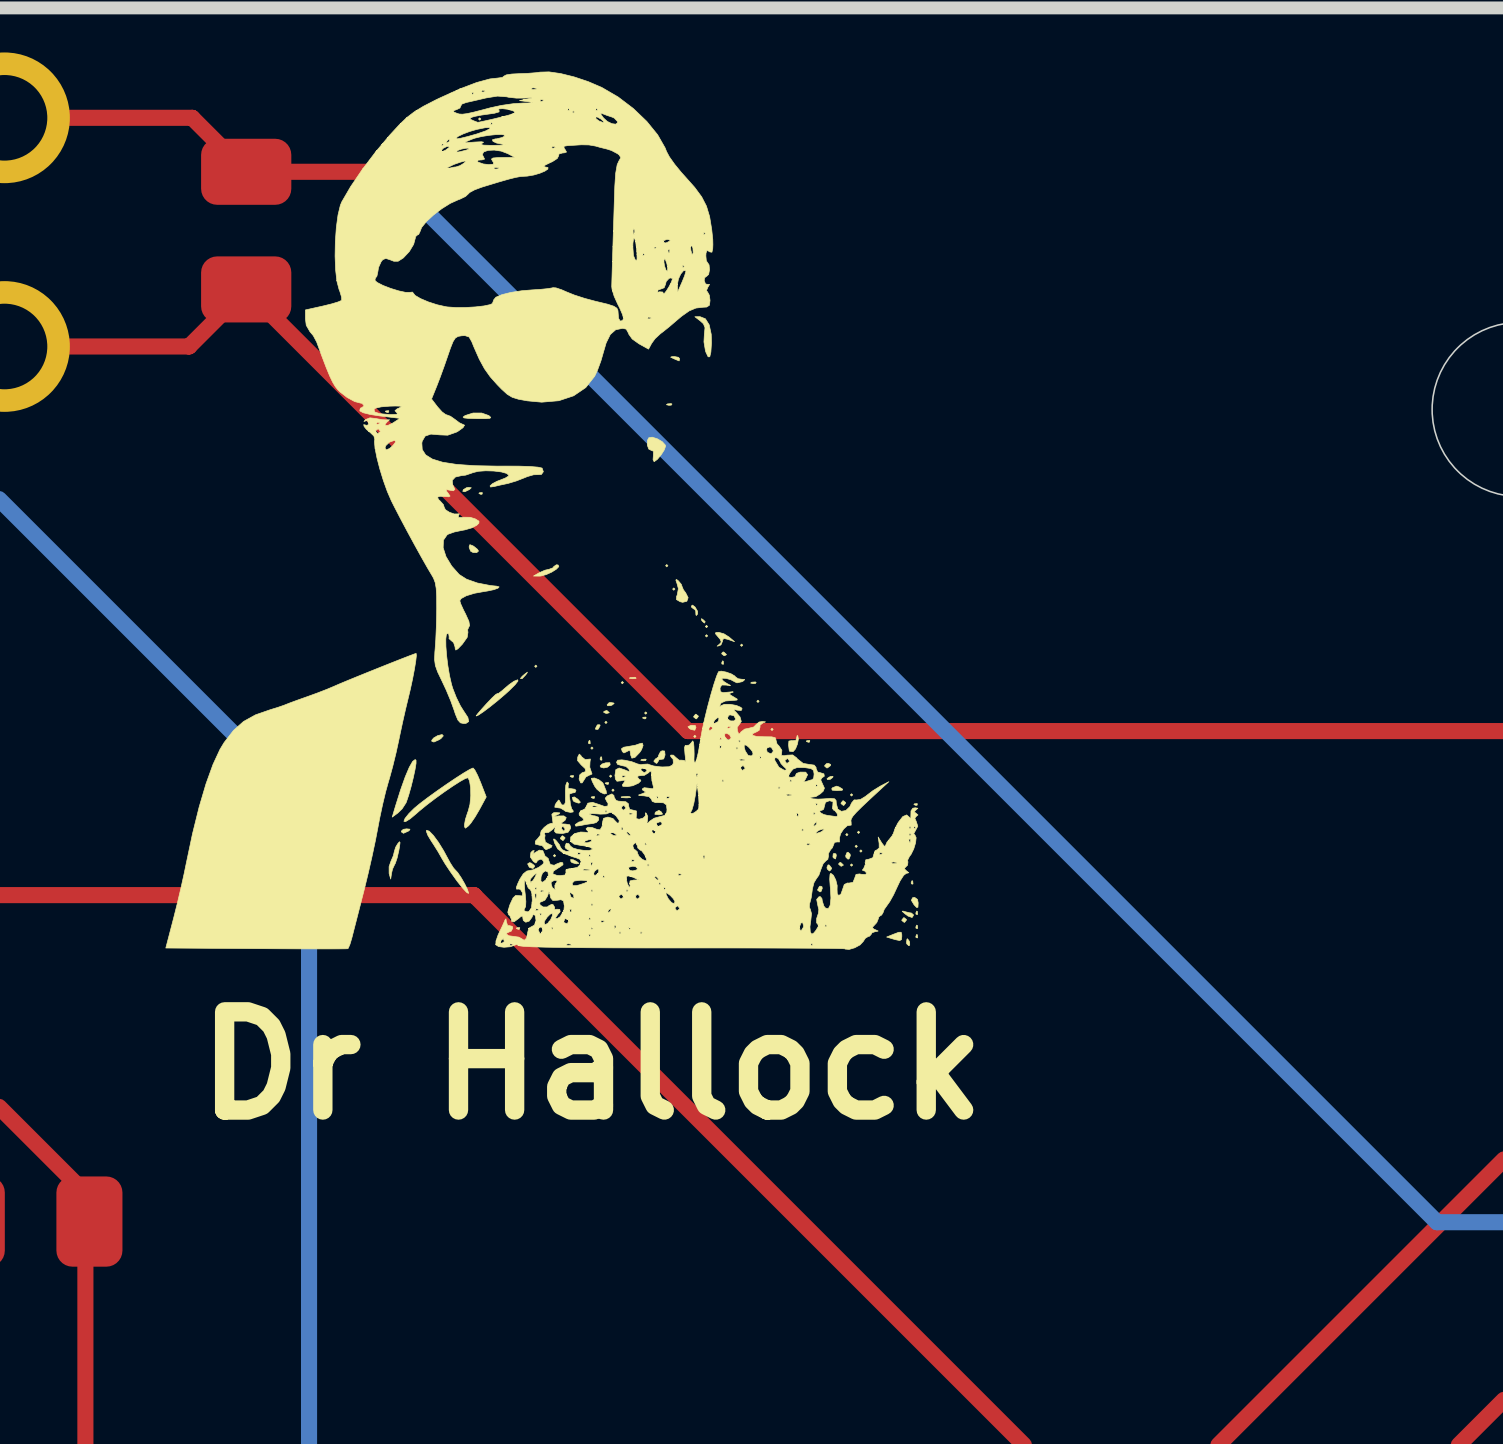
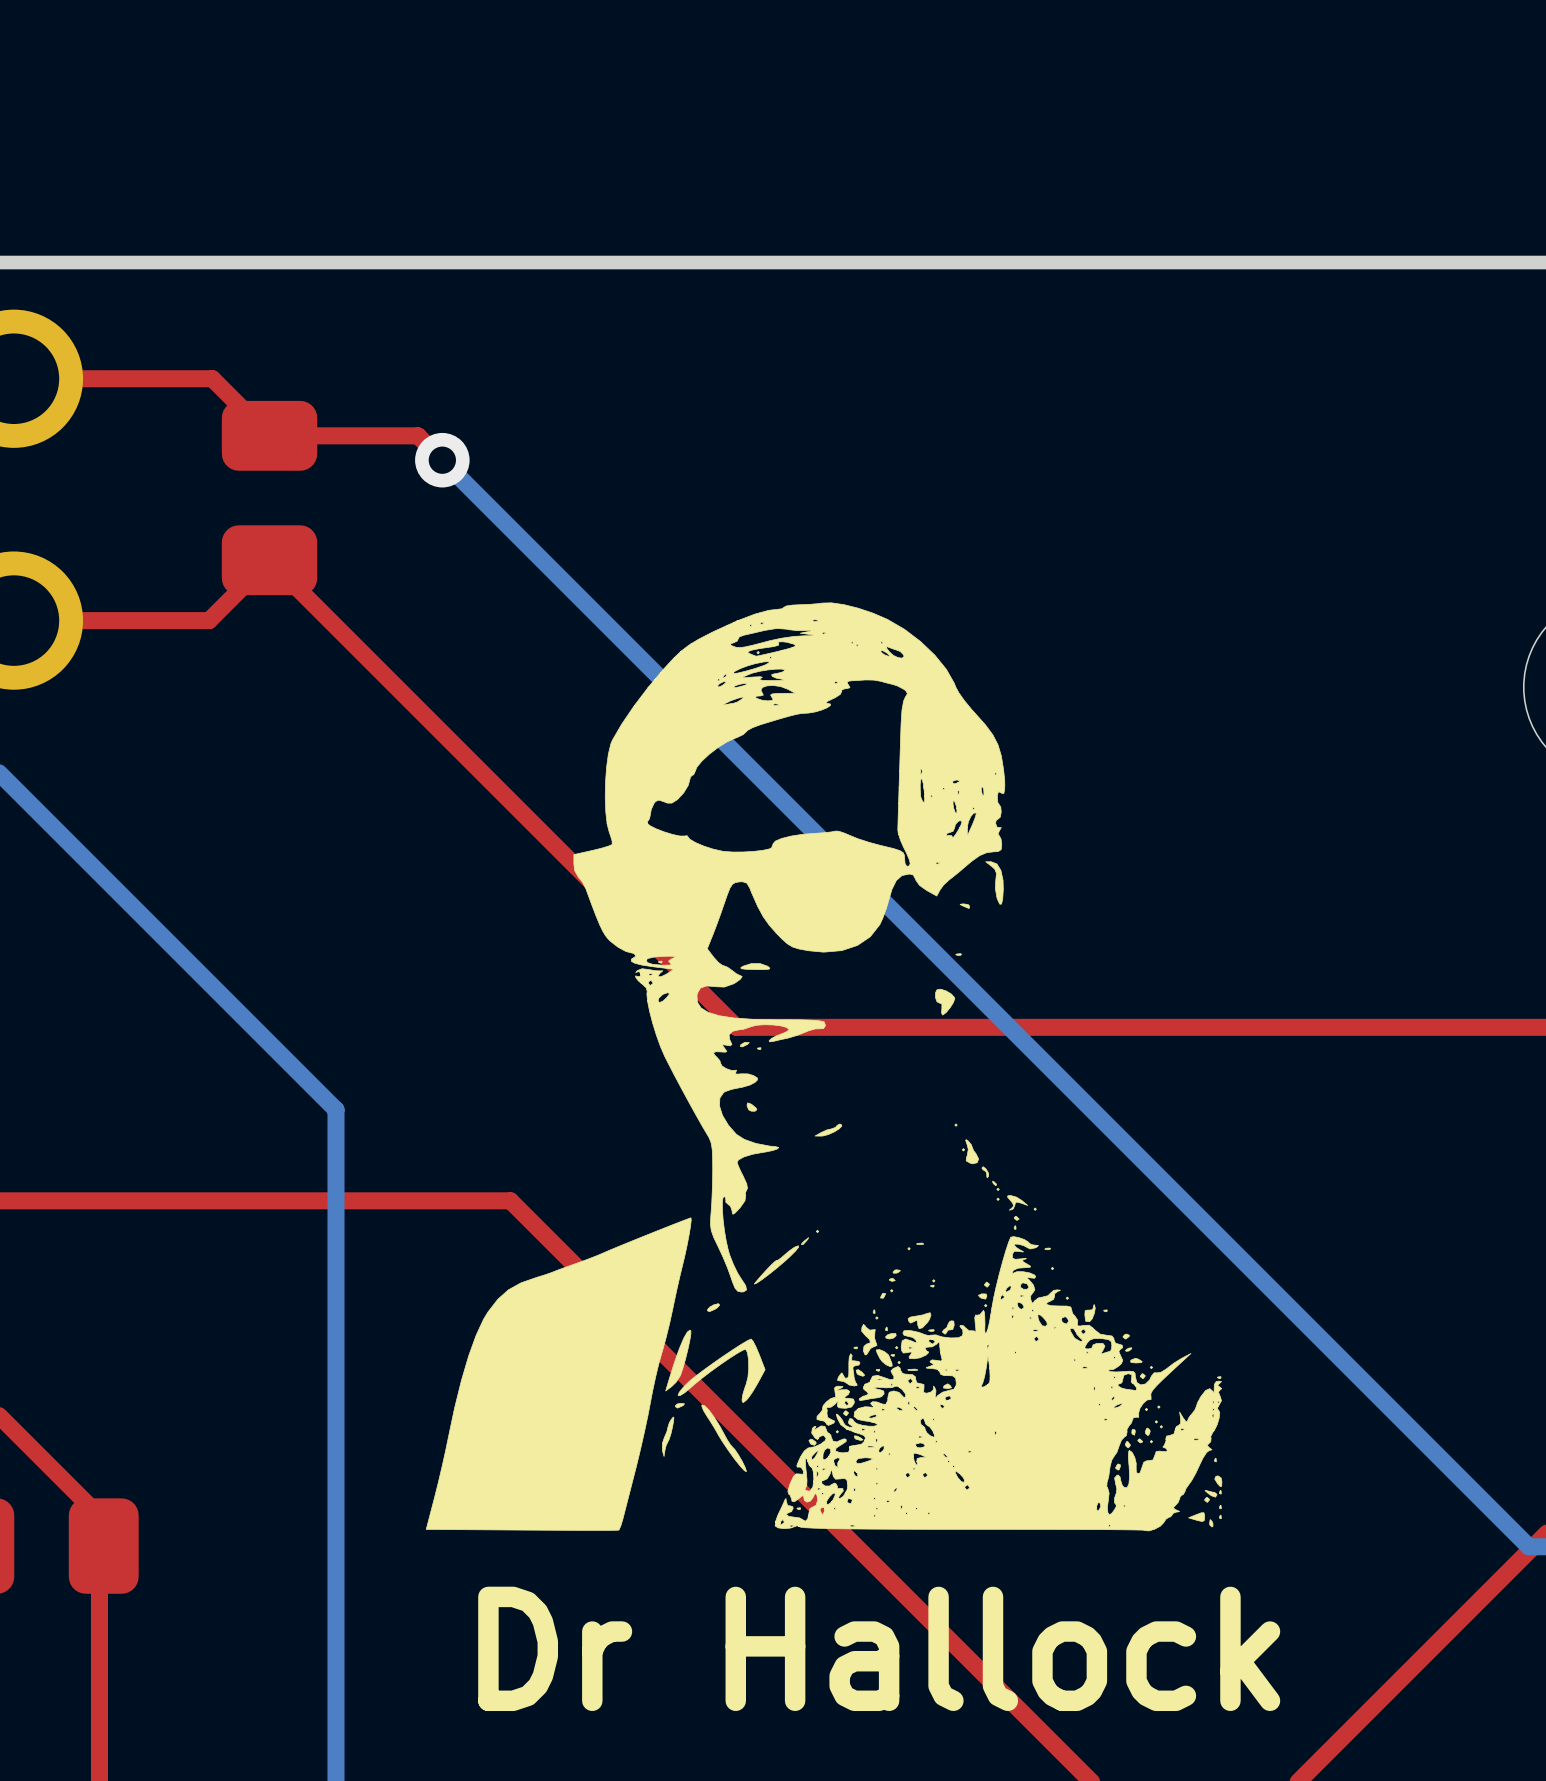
drawing position: (541, 510) -> (824, 1066)

